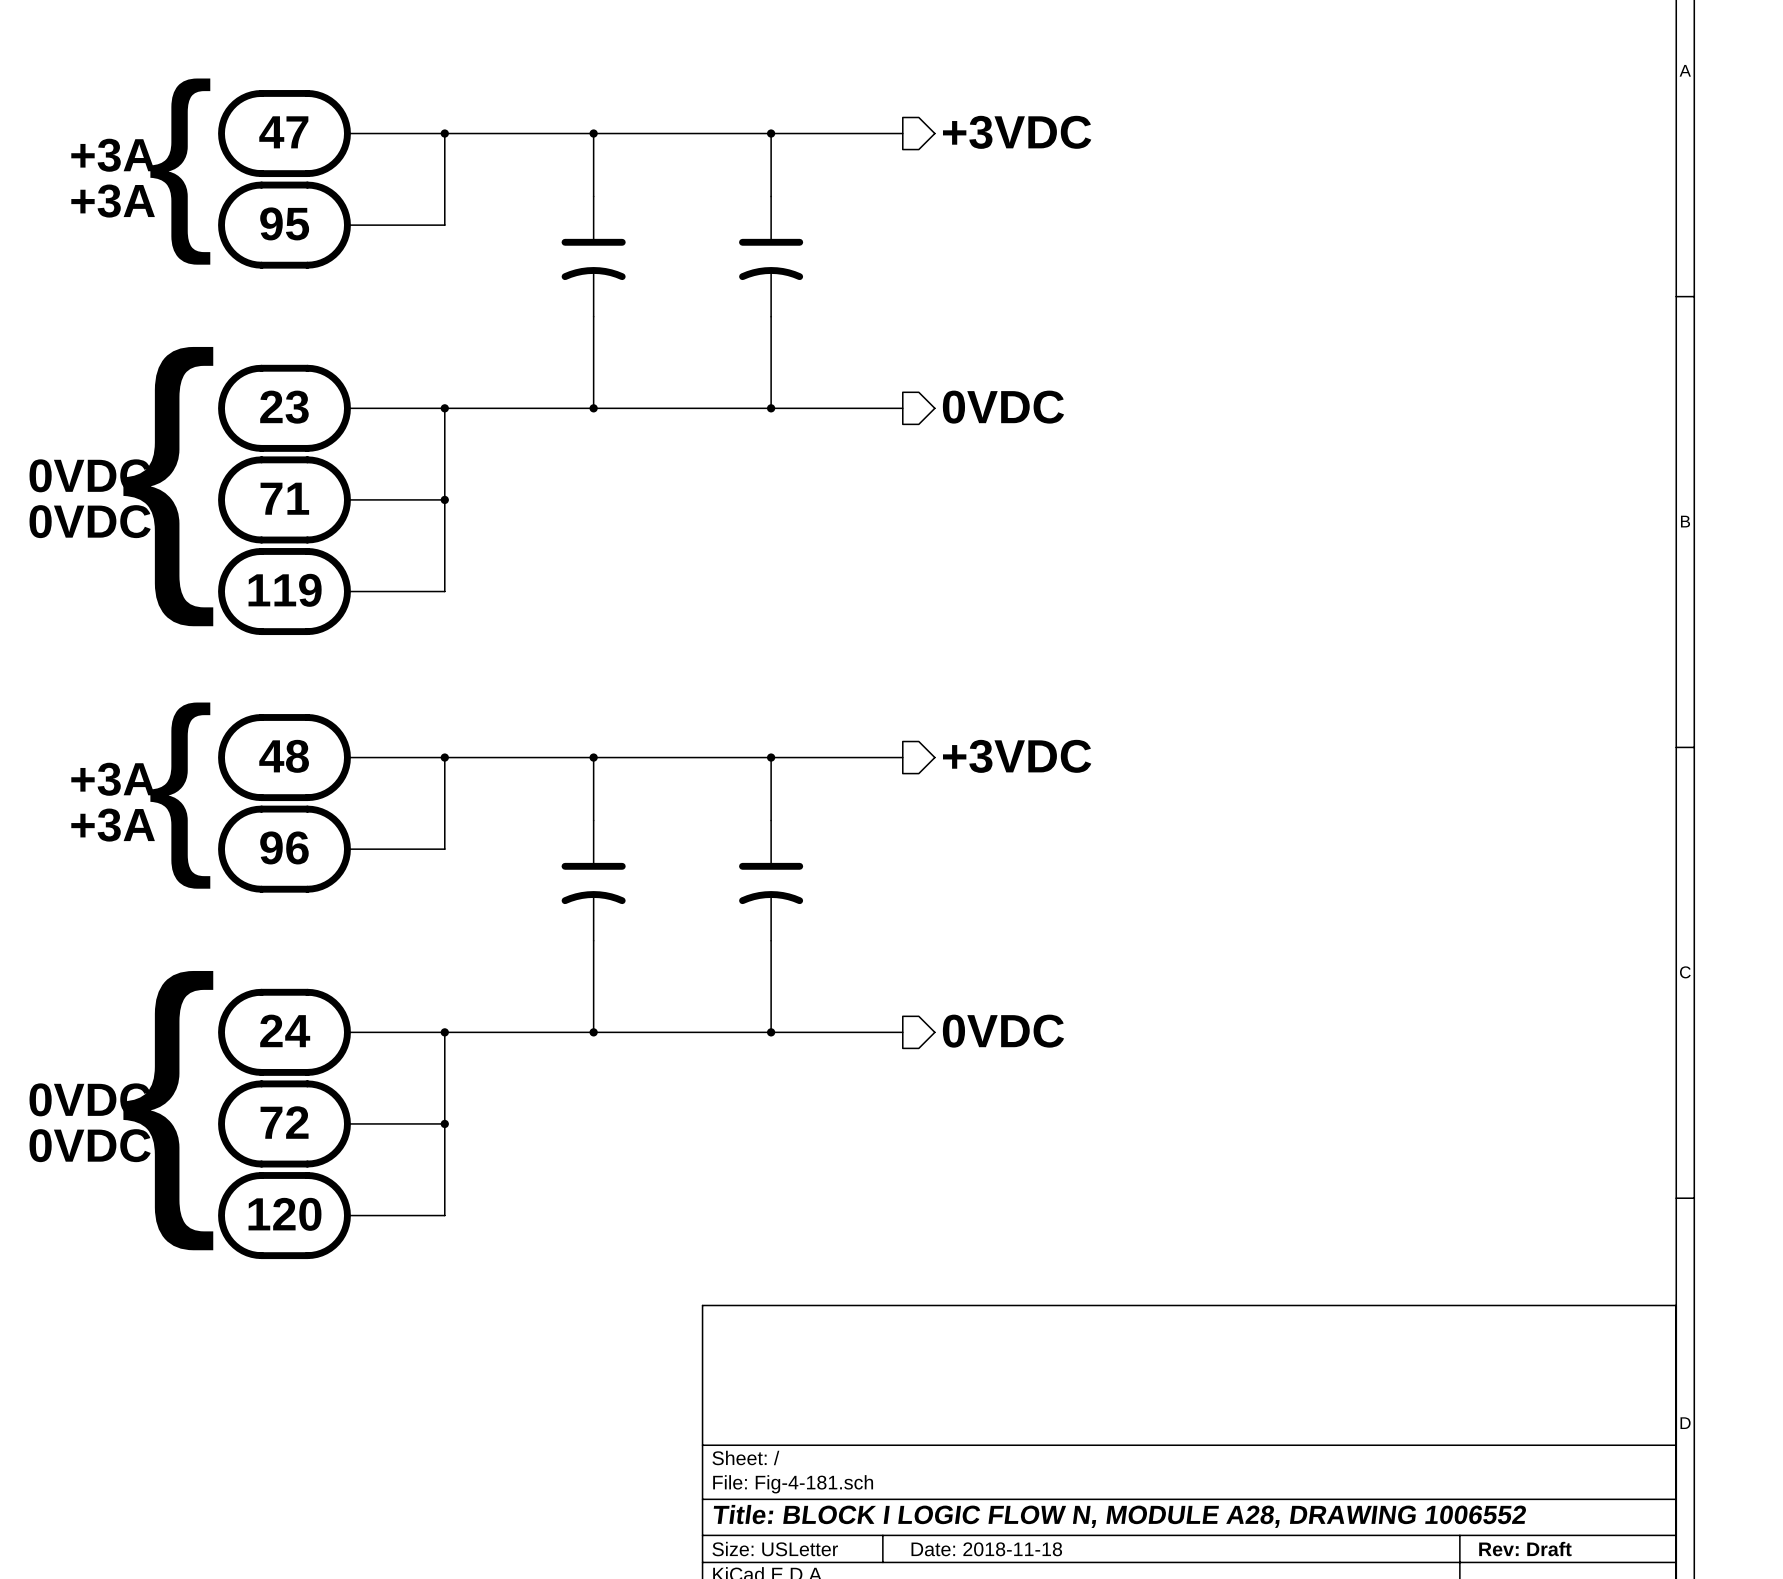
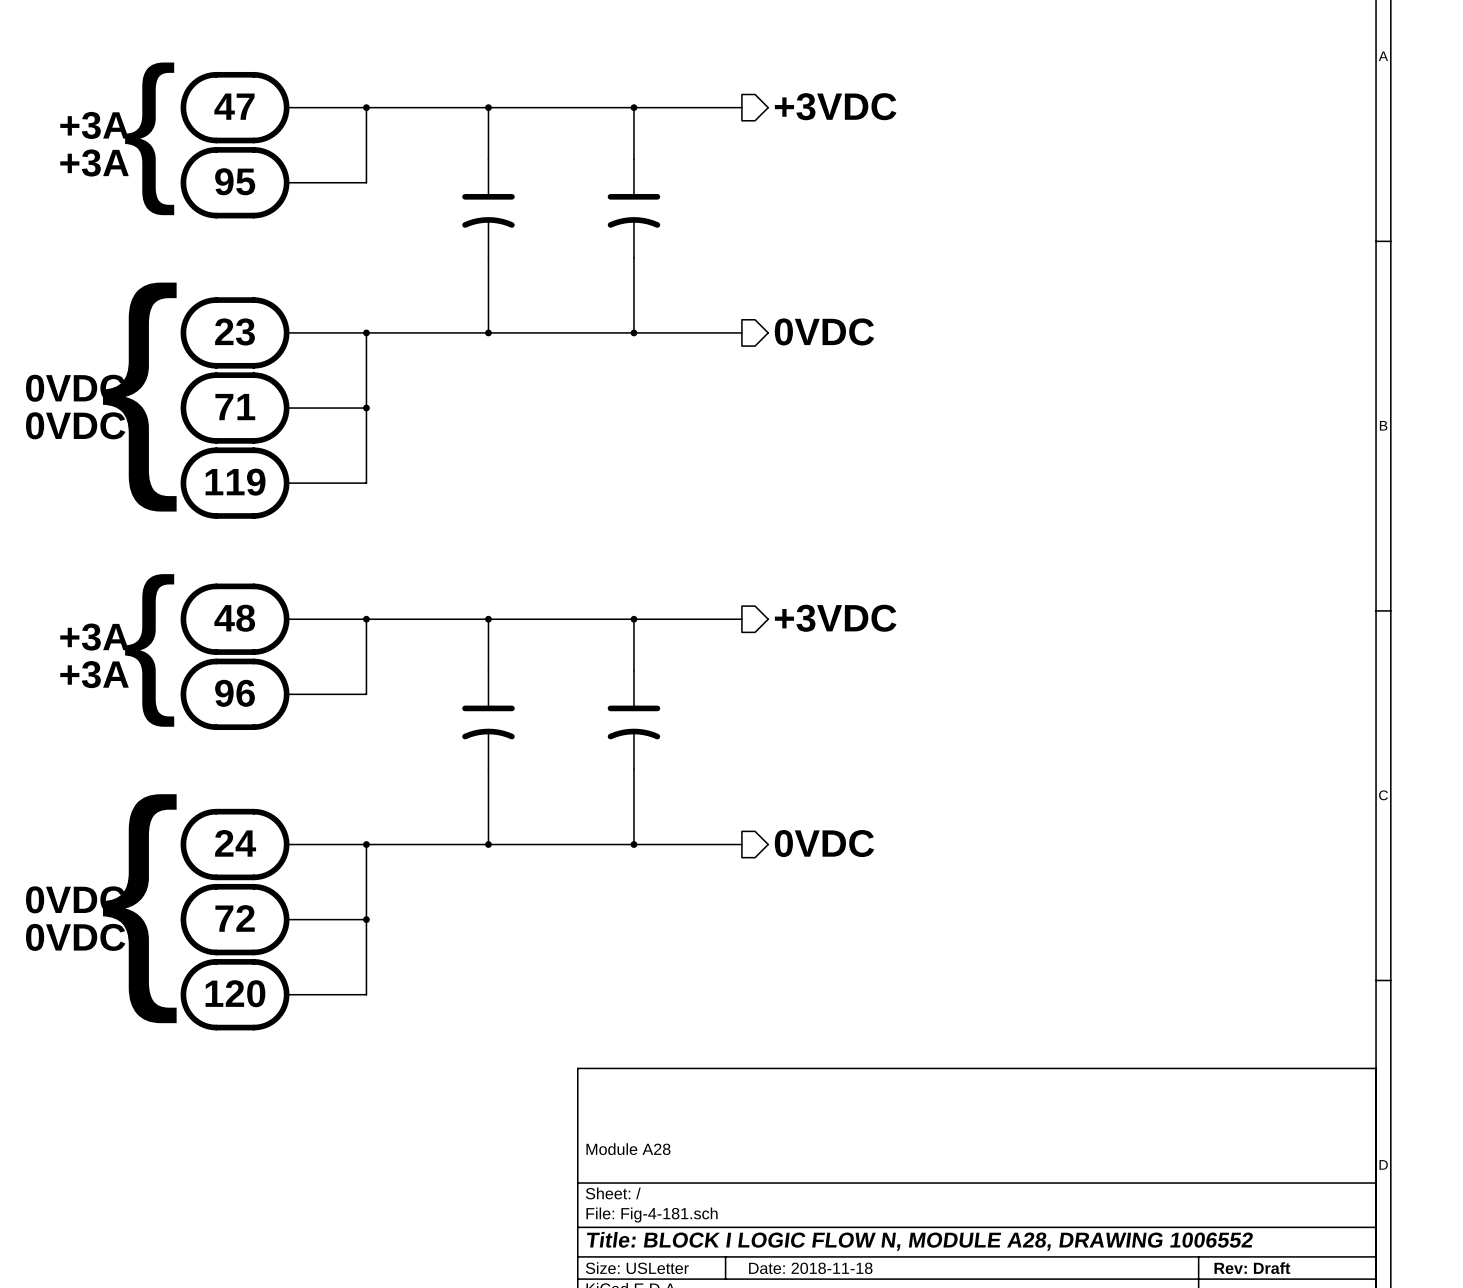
title block: none -> Module A28 (628, 1149)

